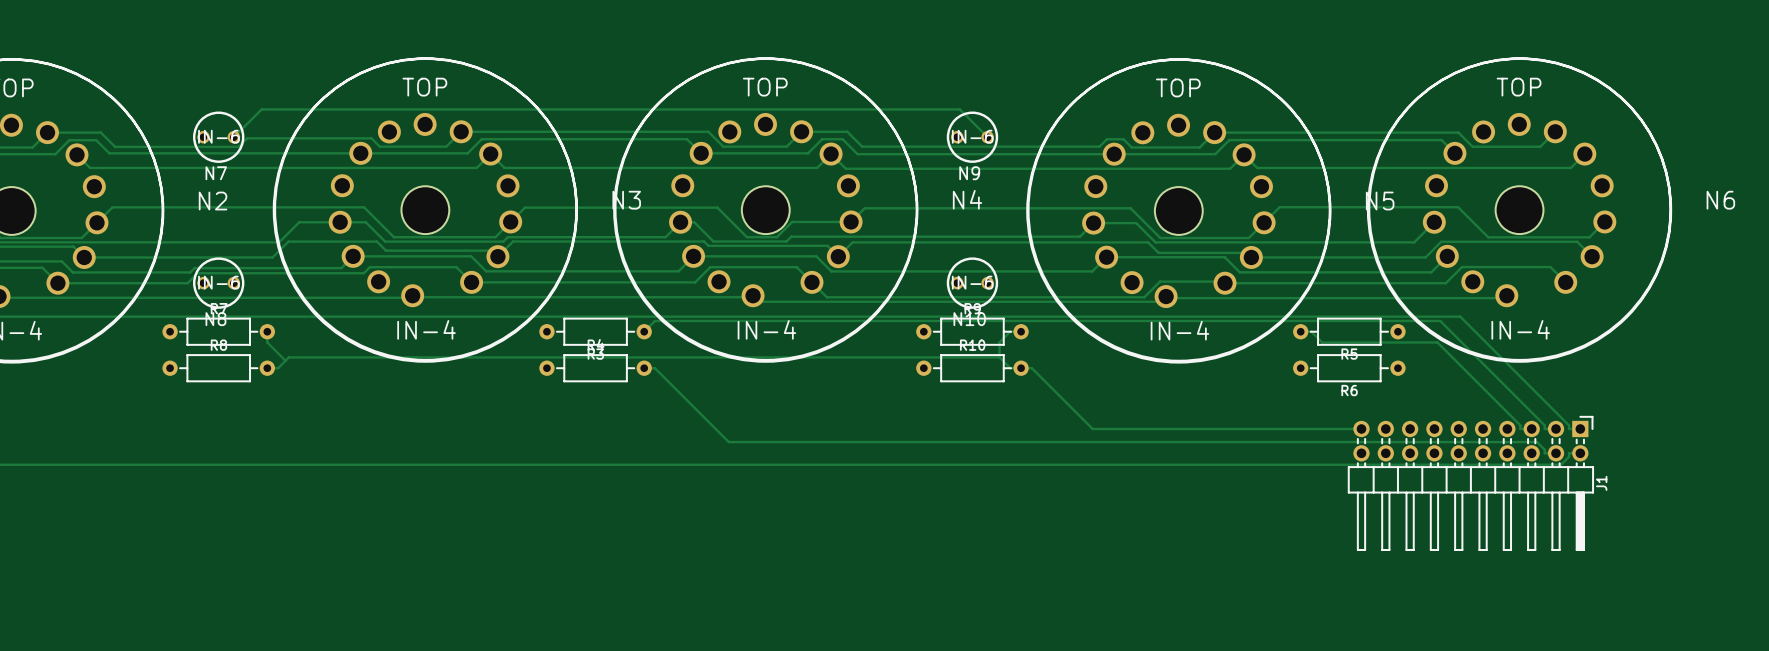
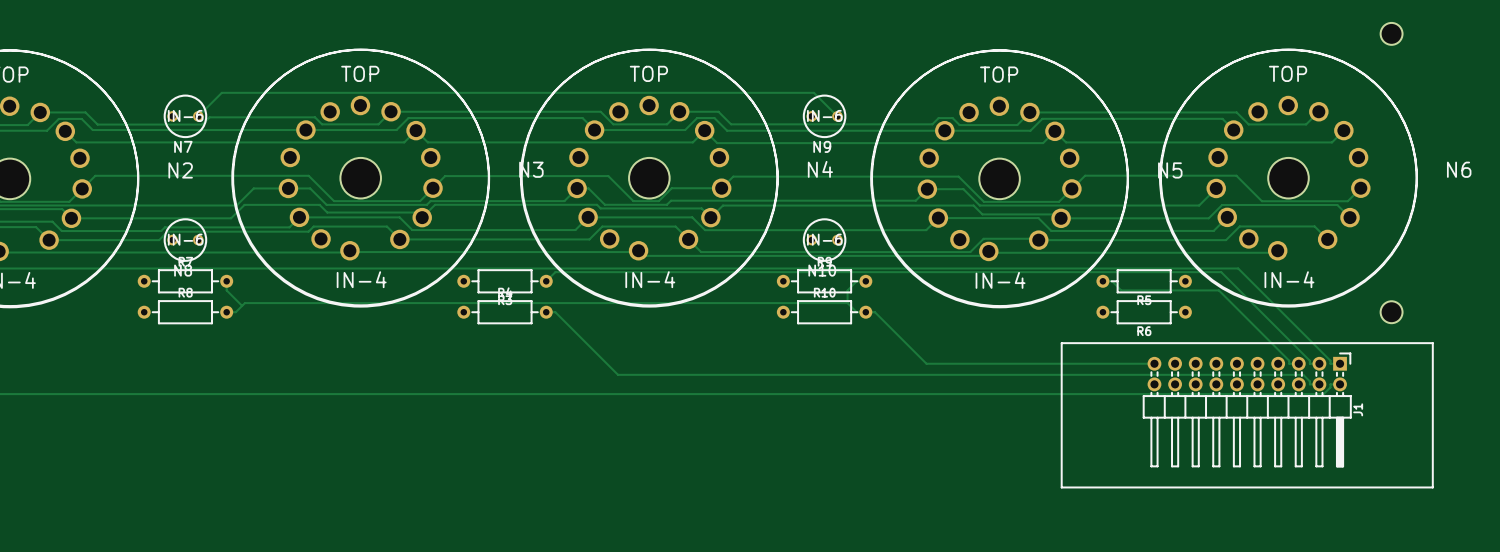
part: none -> (1391, 33)
part: none -> (1391, 312)
J1 footprint: [1348, 416, 1594, 551] -> [1061, 342, 1434, 488]

